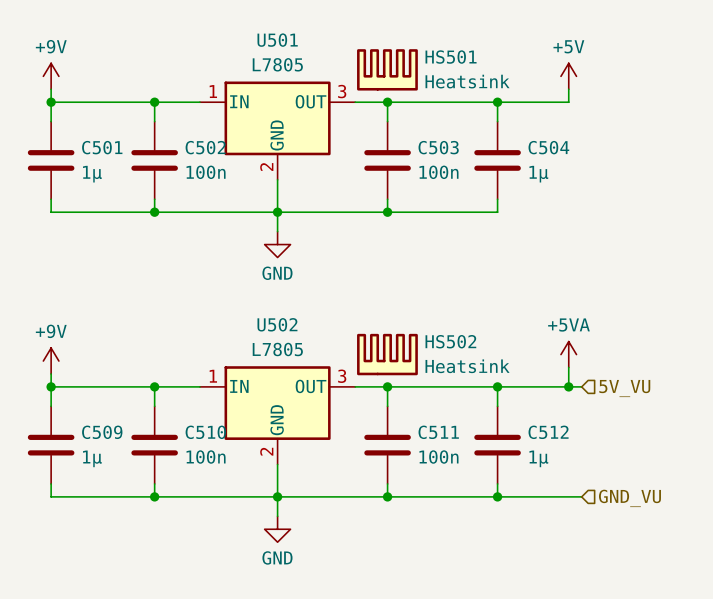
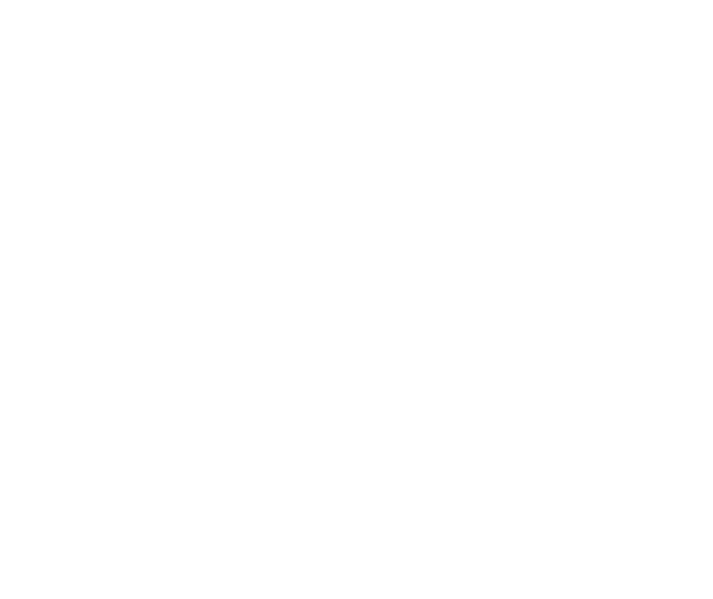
HS501: Heatsink (387, 69) -> none
power symbol: +9V (51, 76) -> none
power symbol: +5V (568, 76) -> none
wire: (51, 89) (51, 121) -> none
wire: (568, 89) (568, 102) (355, 102) -> none
wire: (51, 102) (199, 102) -> none
junction: (51, 102) -> none
wire: (154, 102) (154, 121) -> none
junction: (154, 102) -> none
wire: (387, 102) (387, 121) -> none
junction: (387, 102) -> none
wire: (497, 102) (497, 121) -> none
junction: (497, 102) -> none
U501: L7805 (277, 130) -> none
C501: 1µ (51, 160) -> none
C502: 100n (154, 160) -> none
C503: 100n (387, 160) -> none
C504: 1µ (497, 160) -> none
wire: (277, 179) (277, 231) -> none
wire: (51, 199) (51, 212) (497, 212) (497, 199) -> none
wire: (154, 199) (154, 212) -> none
wire: (387, 199) (387, 212) -> none
junction: (154, 212) -> none
junction: (277, 212) -> none
junction: (387, 212) -> none
power symbol: GND (277, 244) -> none
HS502: Heatsink (387, 354) -> none
power symbol: +5VA (568, 354) -> none
power symbol: +9V (51, 361) -> none
wire: (568, 367) (568, 386) -> none
wire: (51, 373) (51, 406) -> none
wire: (51, 386) (199, 386) -> none
junction: (51, 386) -> none
wire: (154, 386) (154, 406) -> none
junction: (154, 386) -> none
wire: (355, 386) (581, 386) -> none
wire: (387, 386) (387, 406) -> none
junction: (387, 386) -> none
wire: (497, 386) (497, 406) -> none
junction: (497, 386) -> none
junction: (568, 386) -> none
hierarchical label: 5V_VU (624, 388) -> none
U502: L7805 (277, 415) -> none
C509: 1µ (51, 445) -> none
C510: 100n (154, 445) -> none
C511: 100n (387, 445) -> none
C512: 1µ (497, 445) -> none
wire: (277, 464) (277, 516) -> none
wire: (51, 483) (51, 496) (581, 496) -> none
wire: (154, 483) (154, 496) -> none
wire: (387, 483) (387, 496) -> none
wire: (497, 483) (497, 496) -> none
junction: (154, 496) -> none
junction: (277, 496) -> none
junction: (387, 496) -> none
junction: (497, 496) -> none
hierarchical label: GND_VU (629, 498) -> none
power symbol: GND (277, 529) -> none

